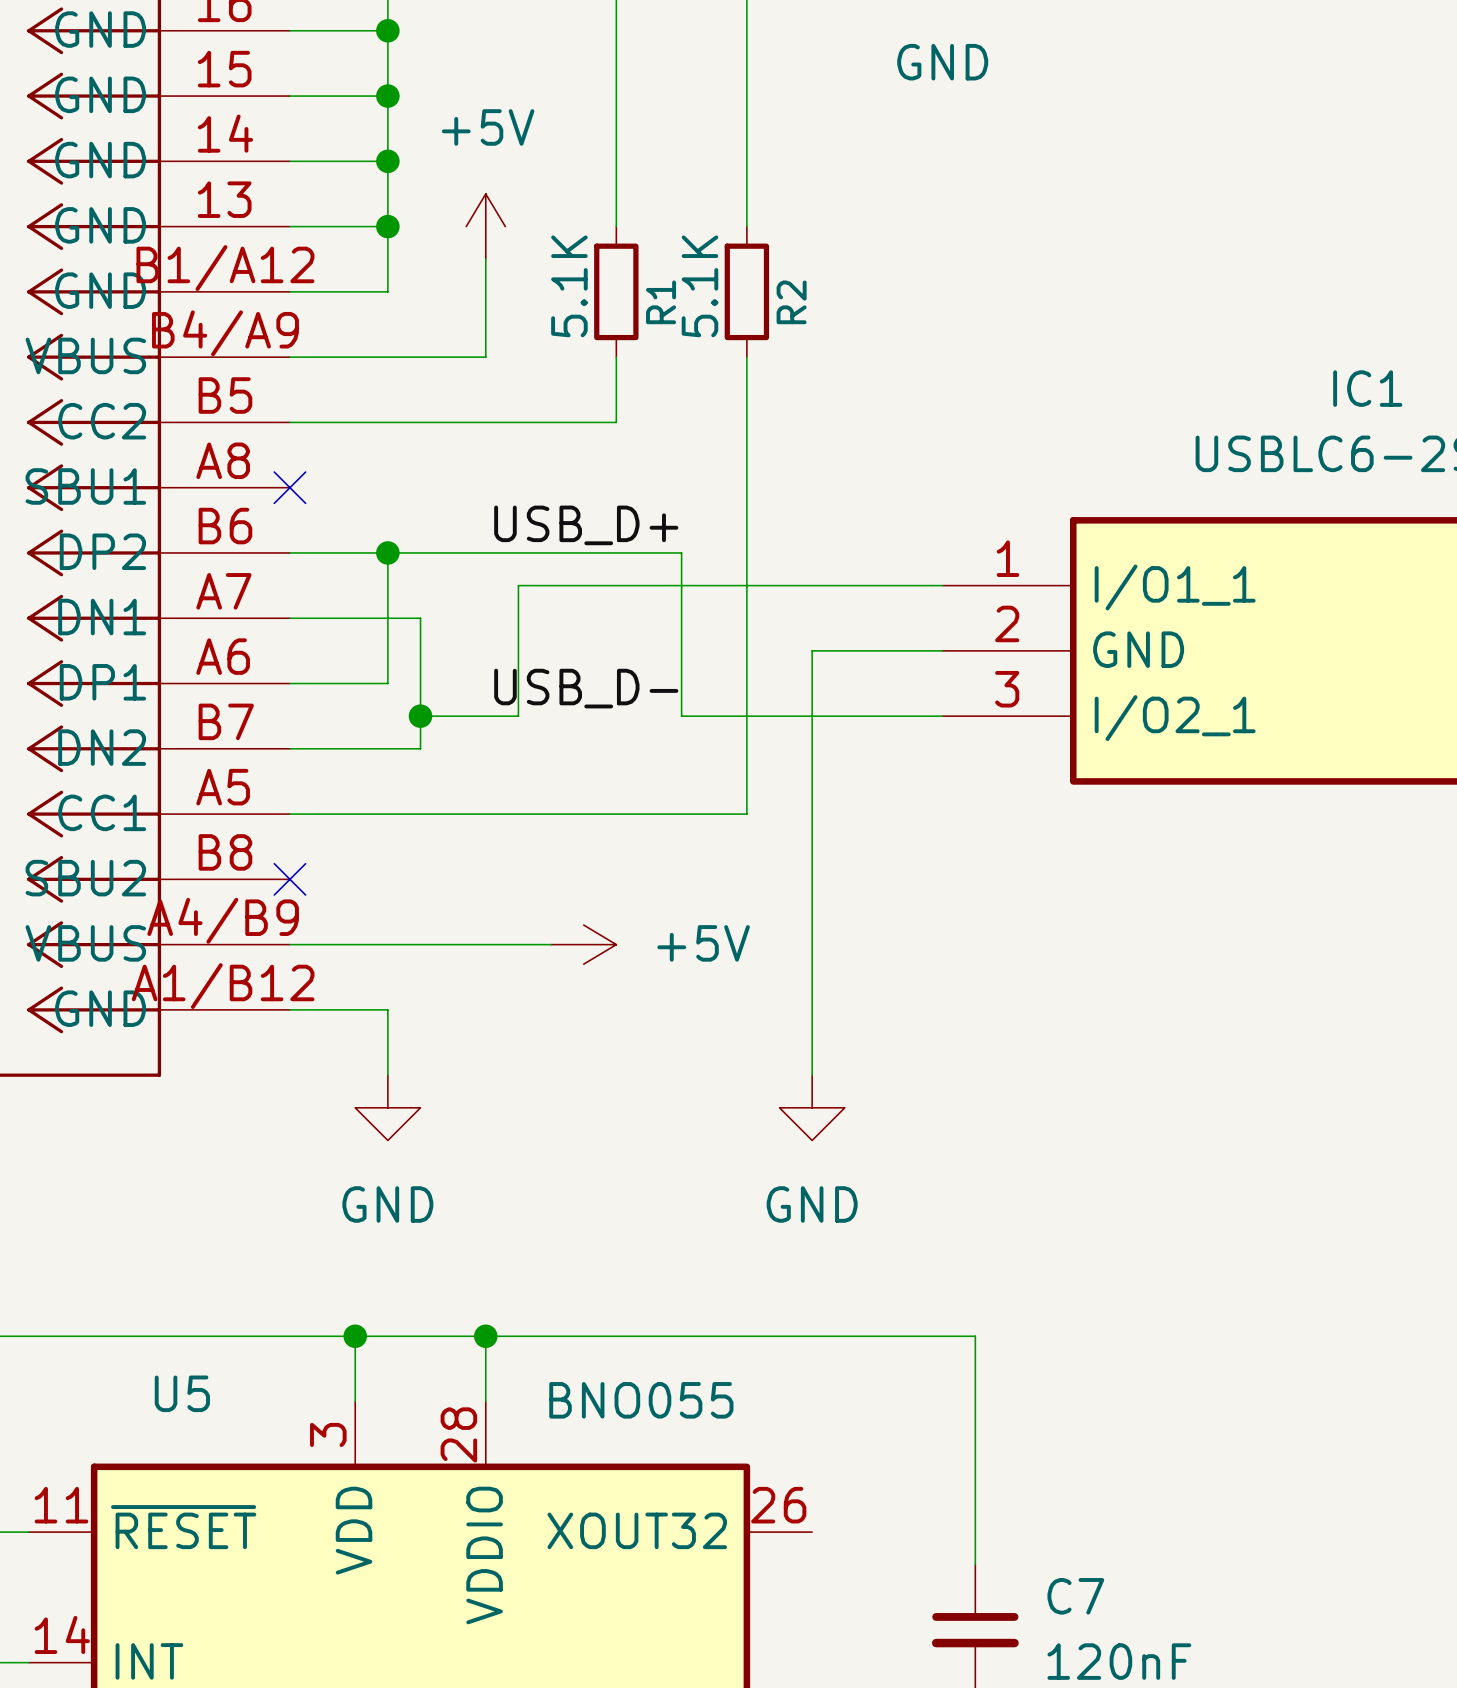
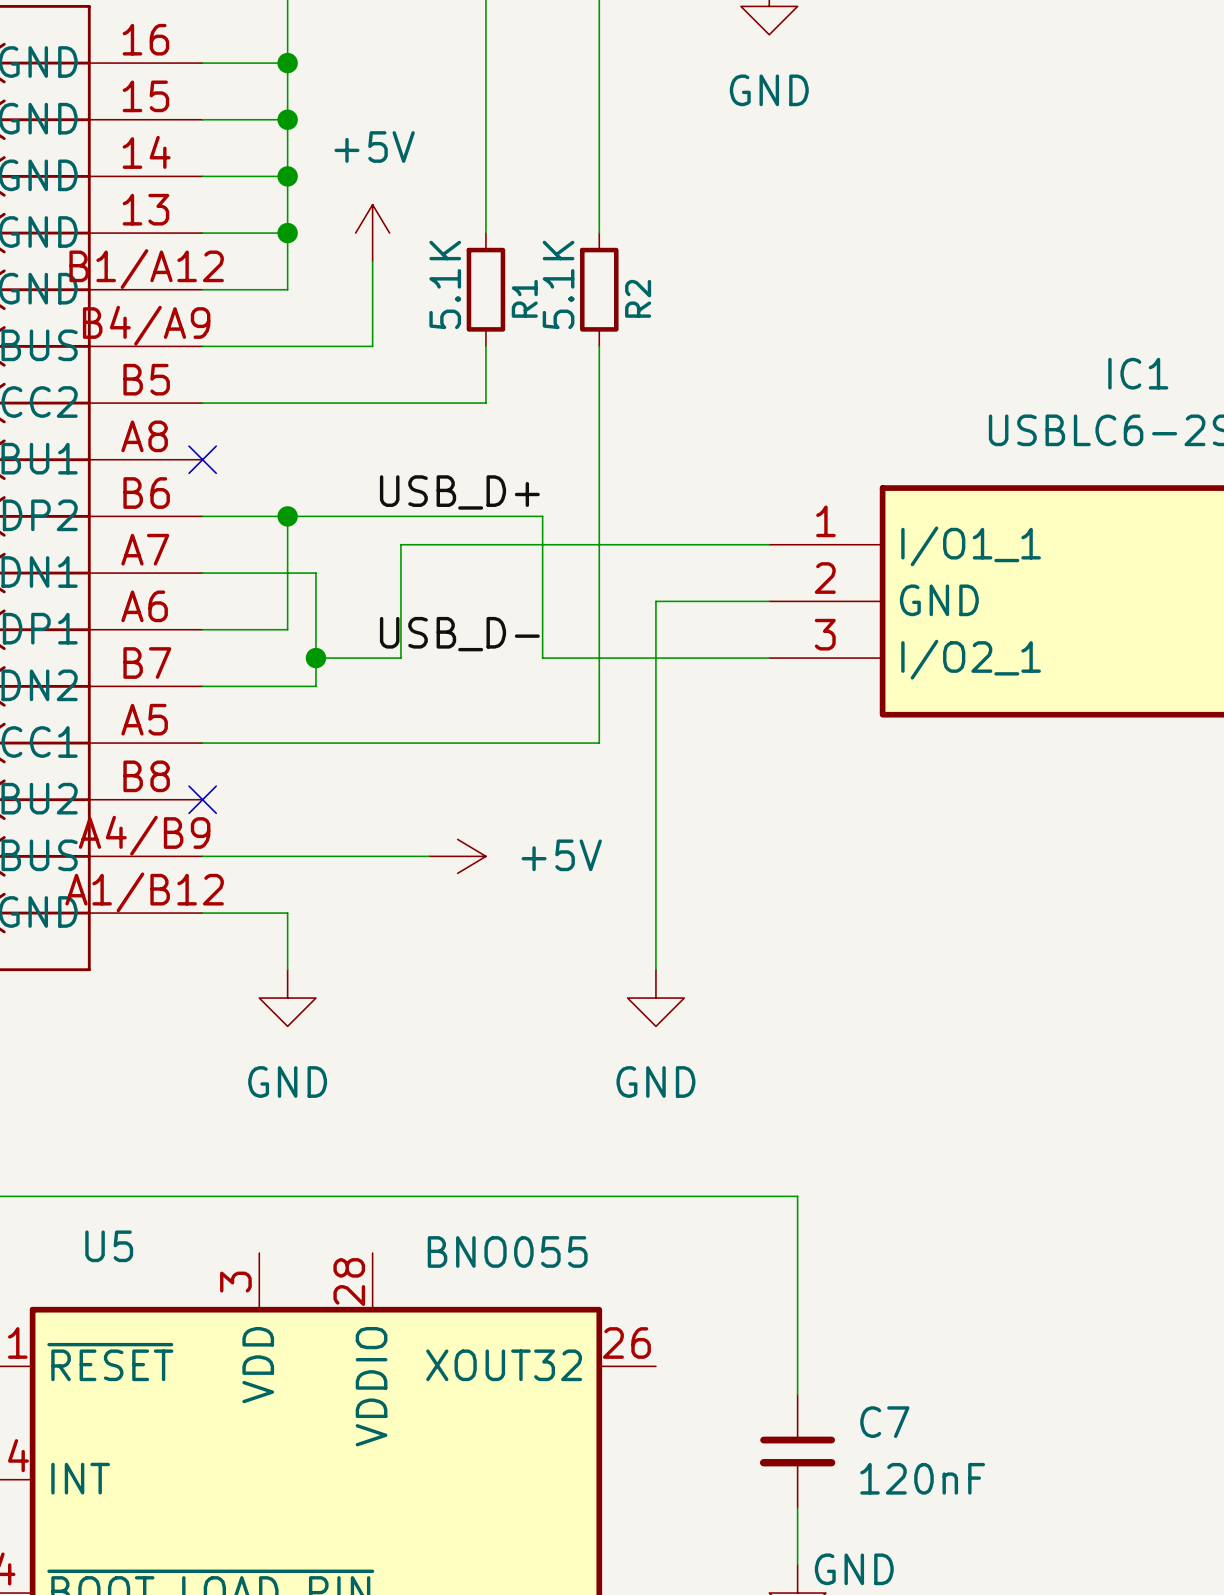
wire: (355, 1336) (355, 1401) -> none
junction: (355, 1336) -> none
wire: (485, 1336) (485, 1401) -> none
junction: (485, 1336) -> none

